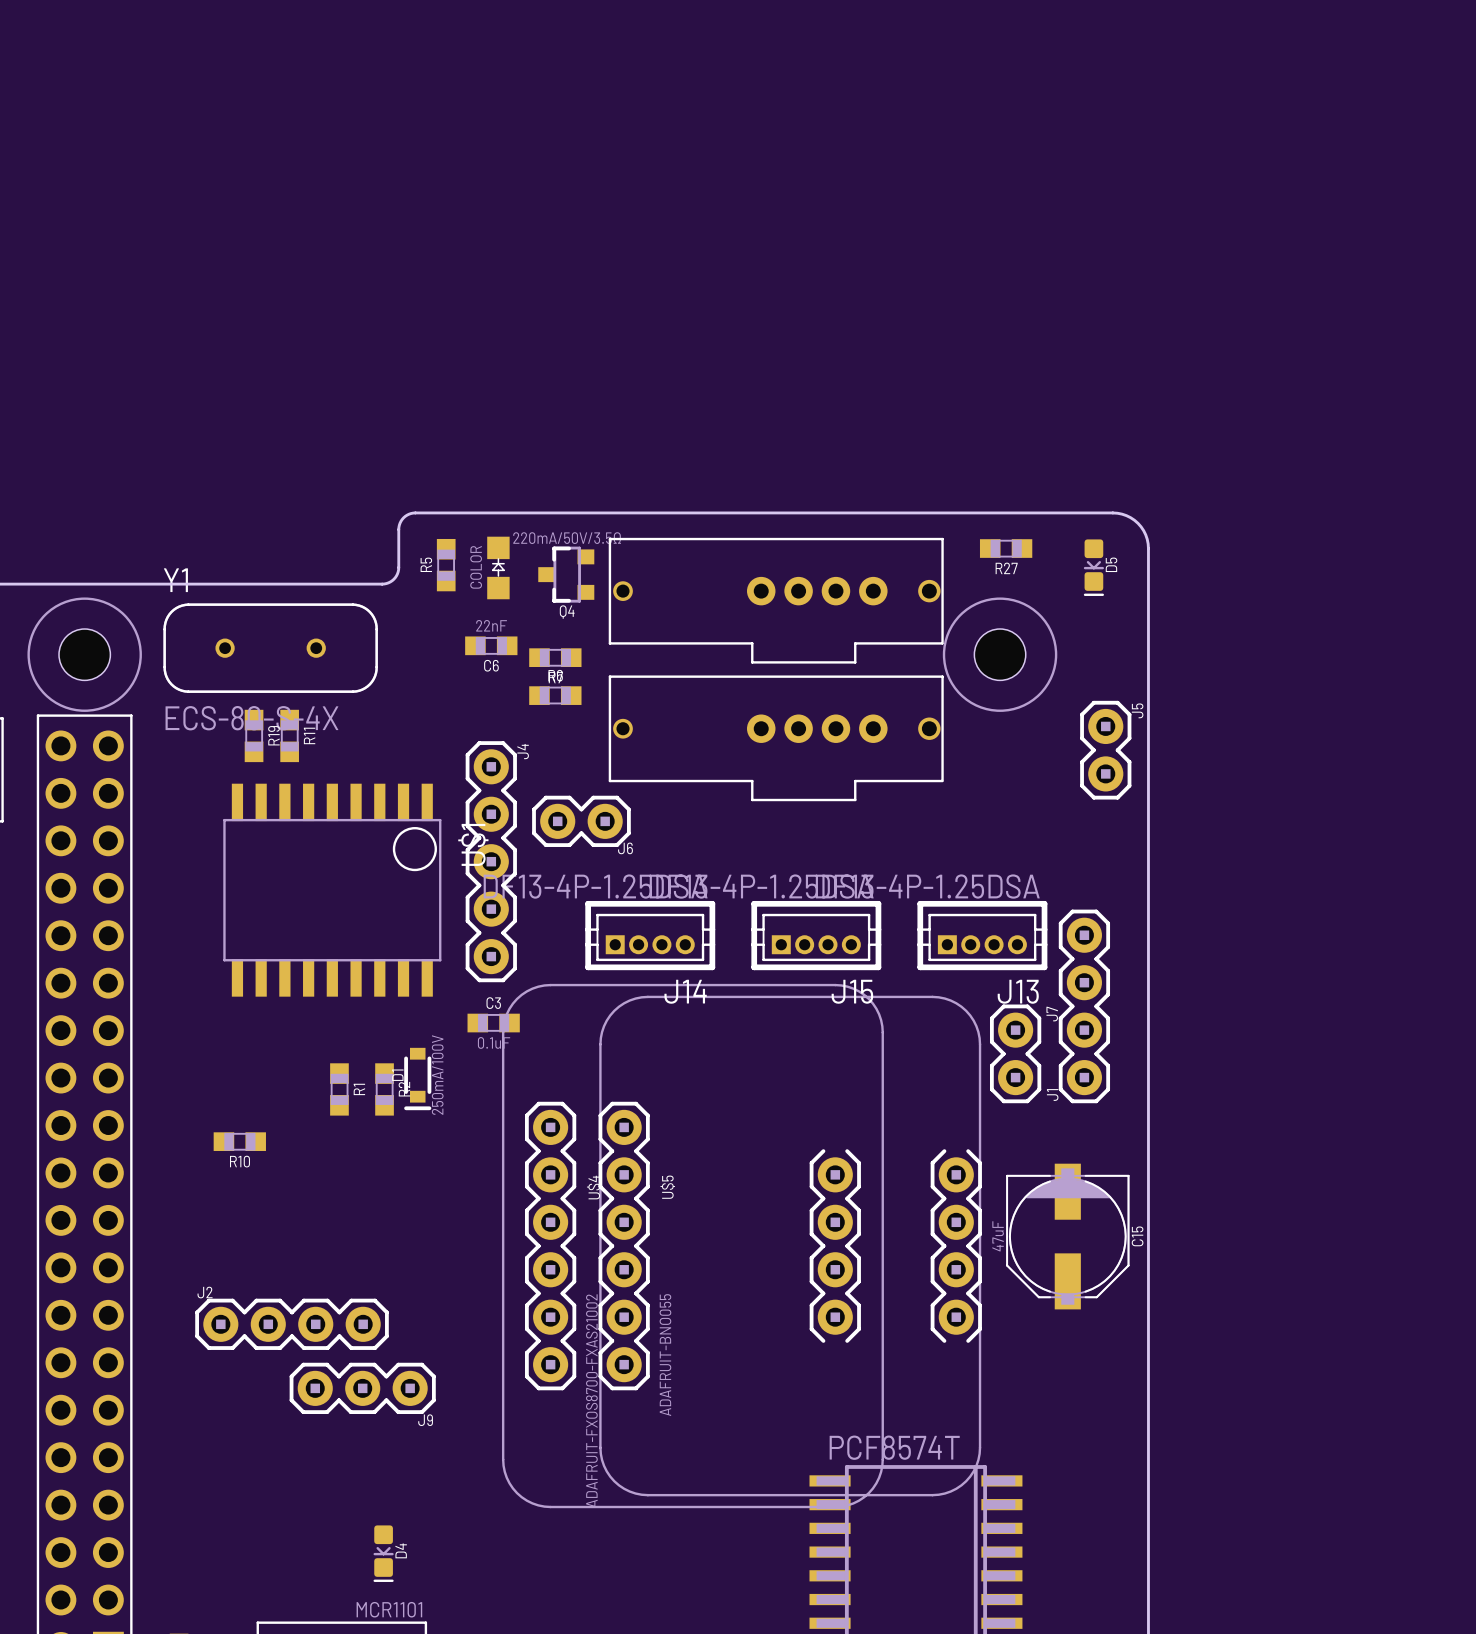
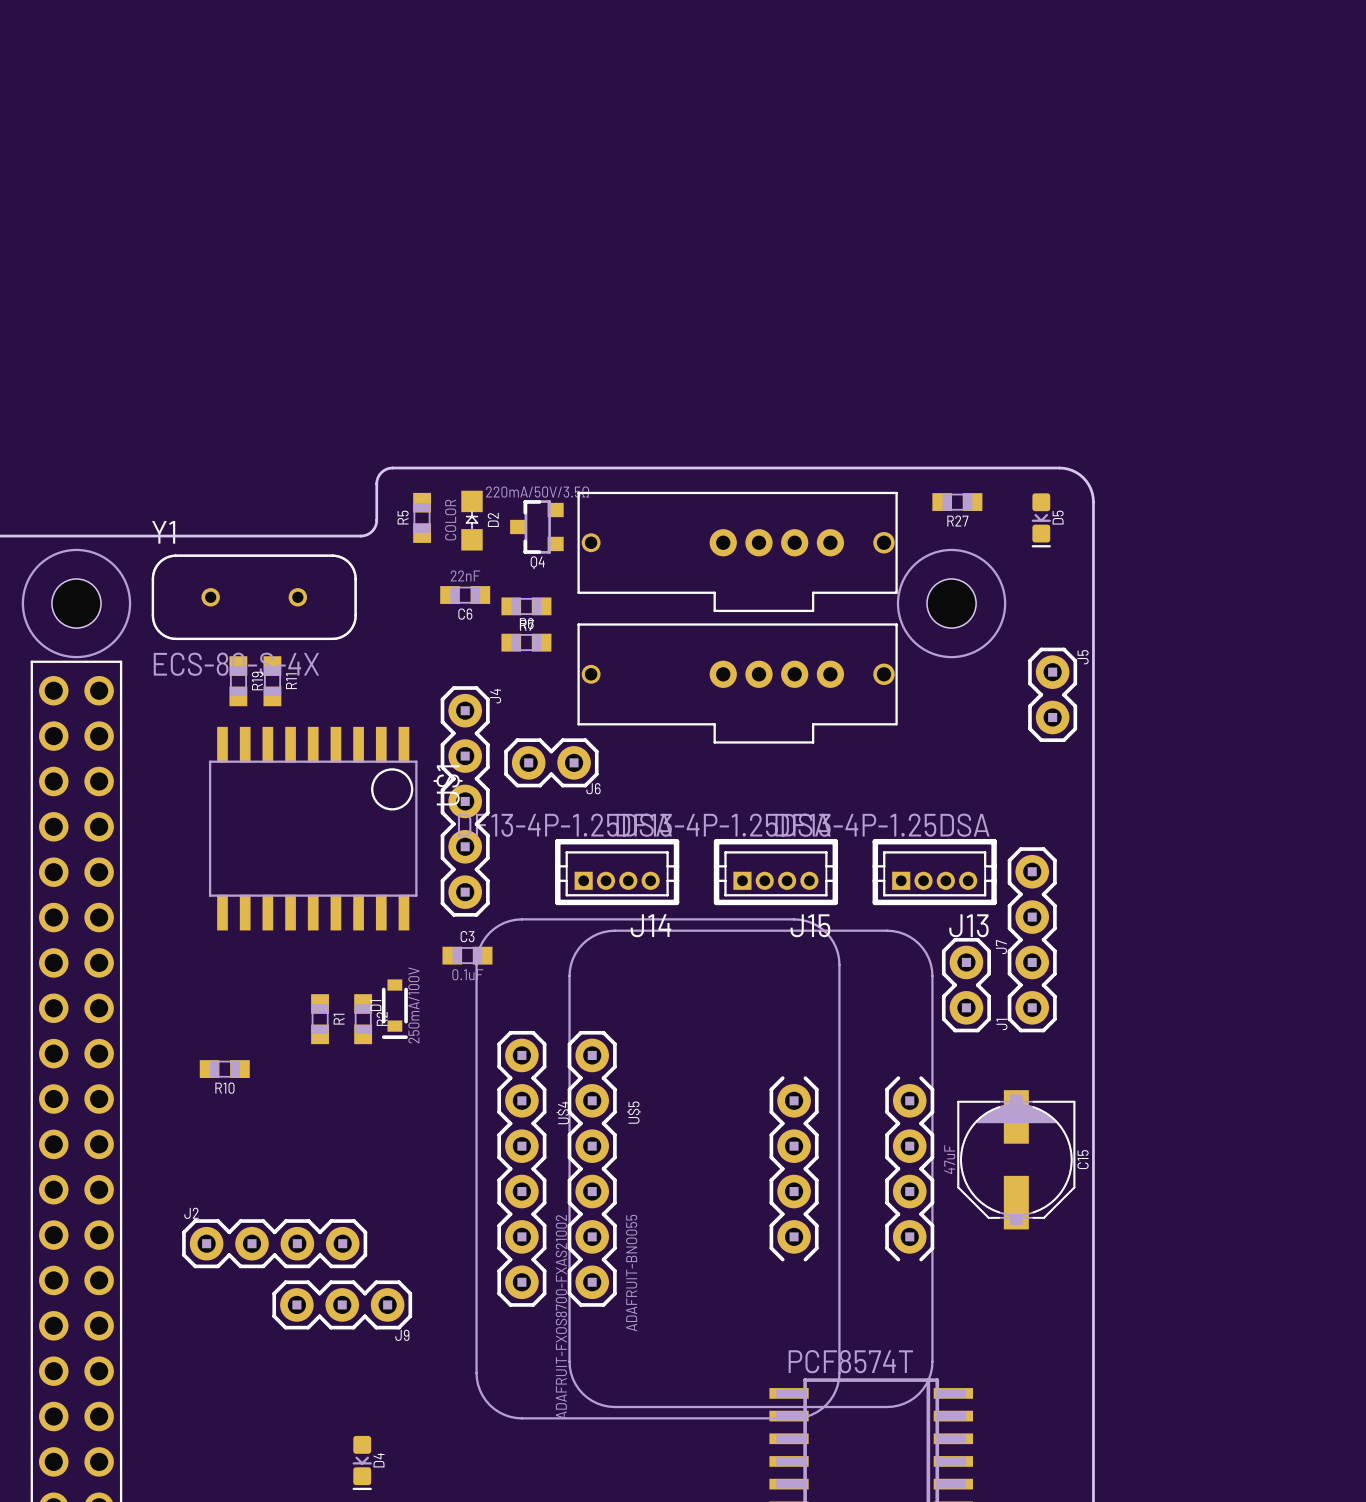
D2 name: none -> D2 (493, 519)

